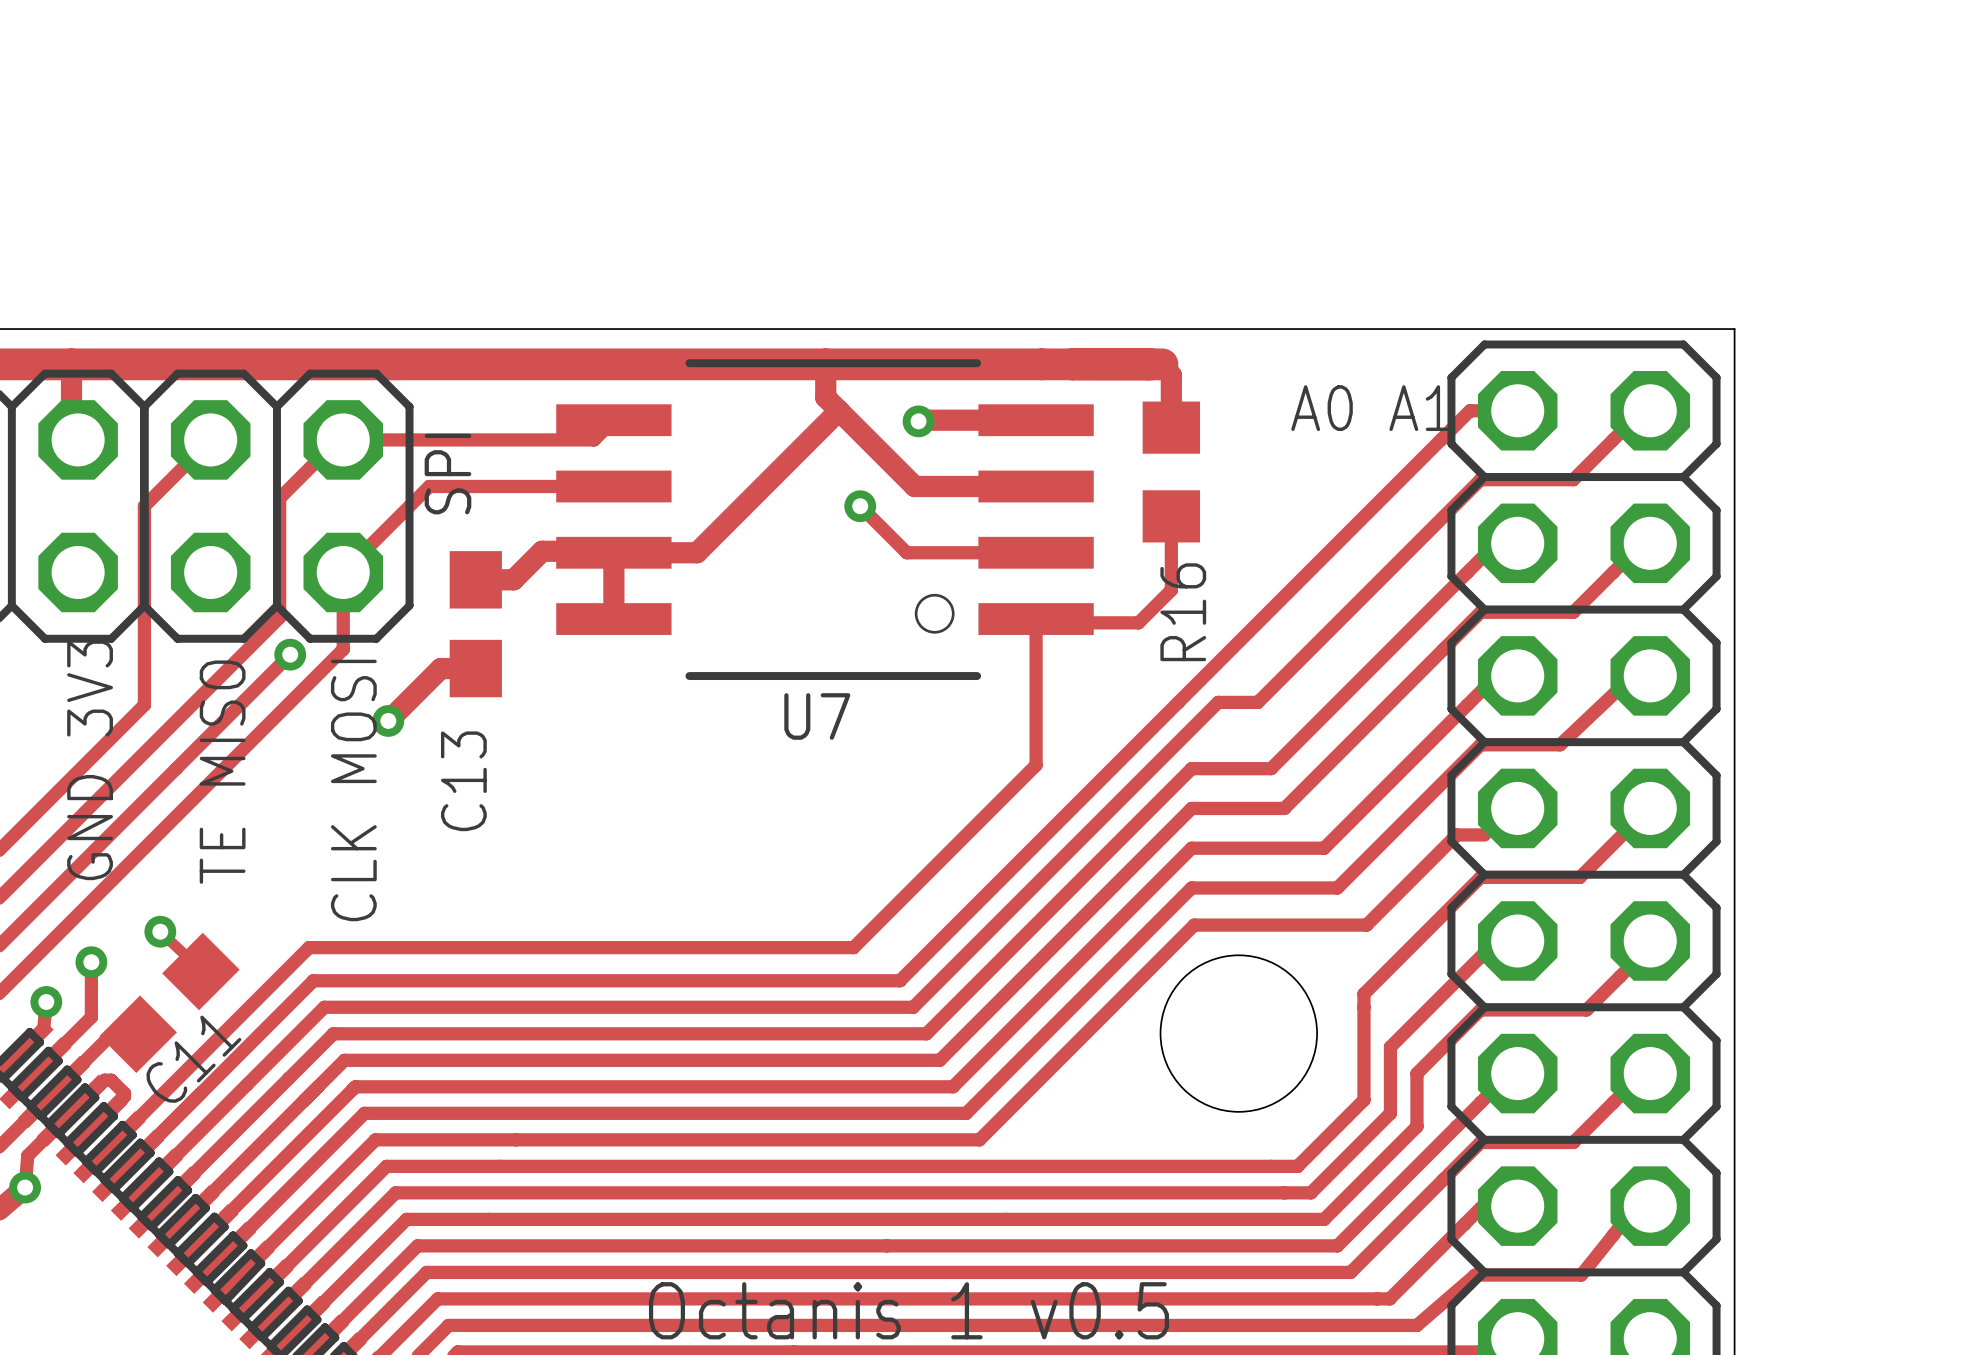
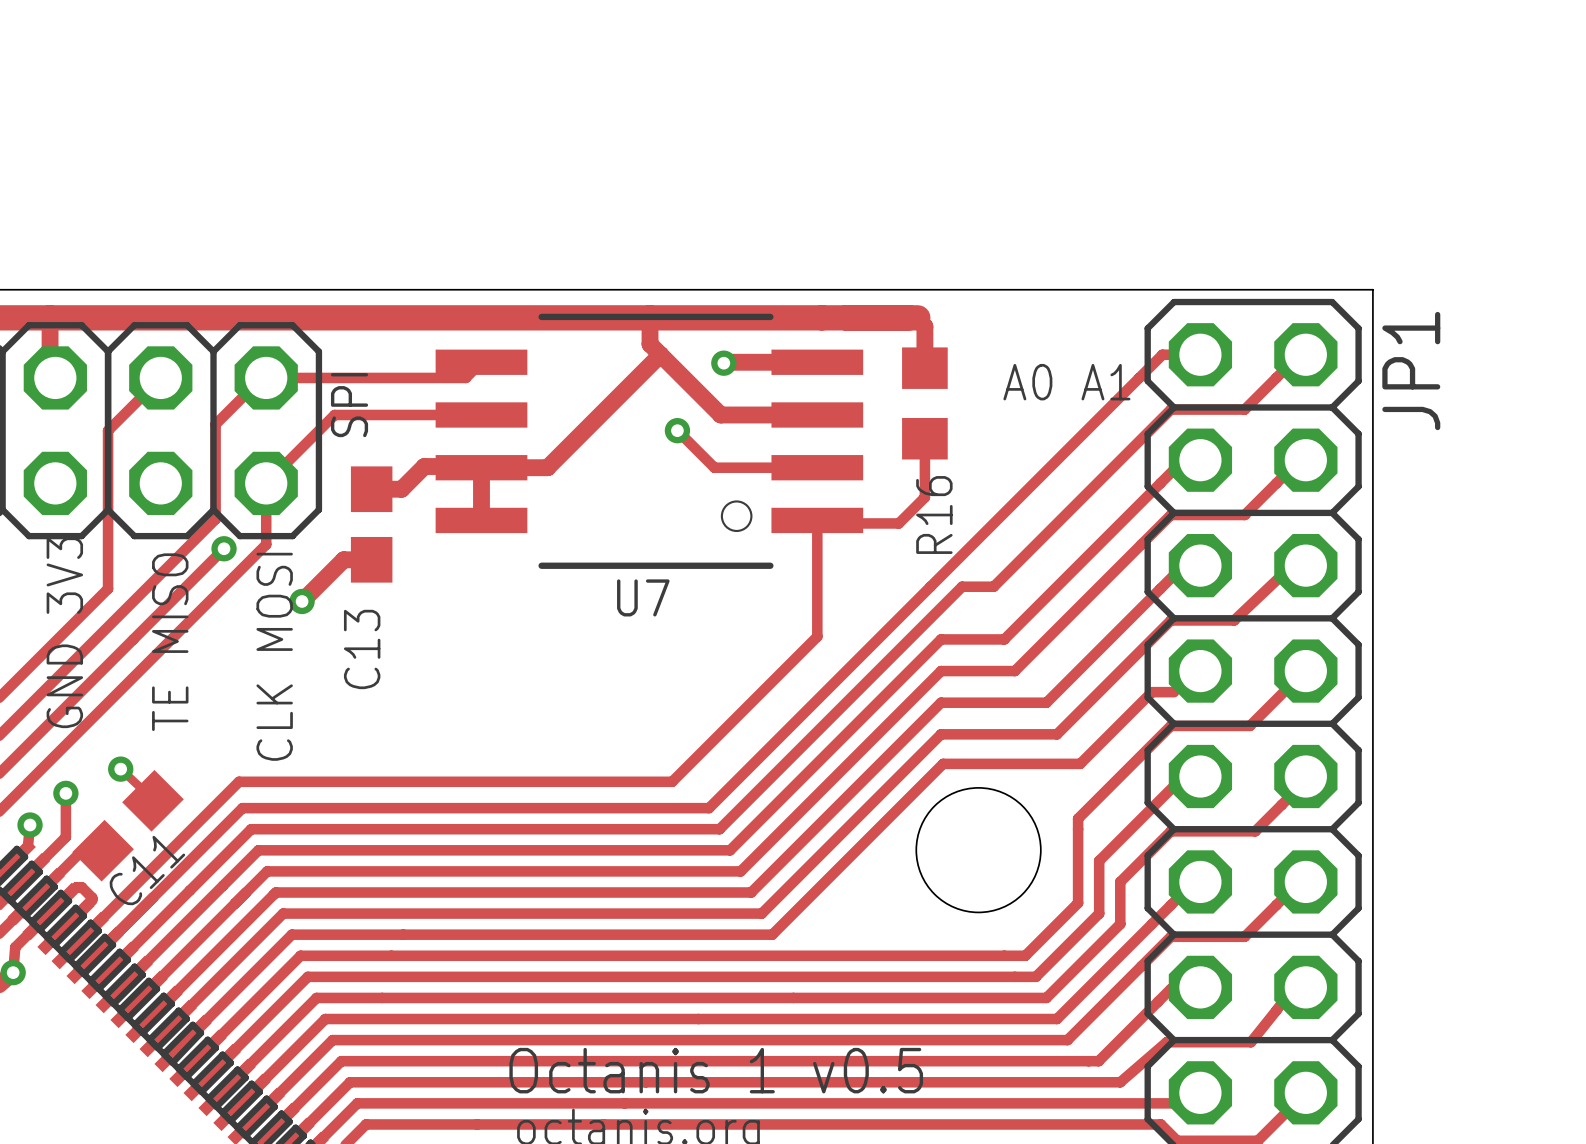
text position: A0 A1 (1371, 408) -> A0 A1 (1066, 382)
JP1 name: none -> JP1 (1411, 371)

